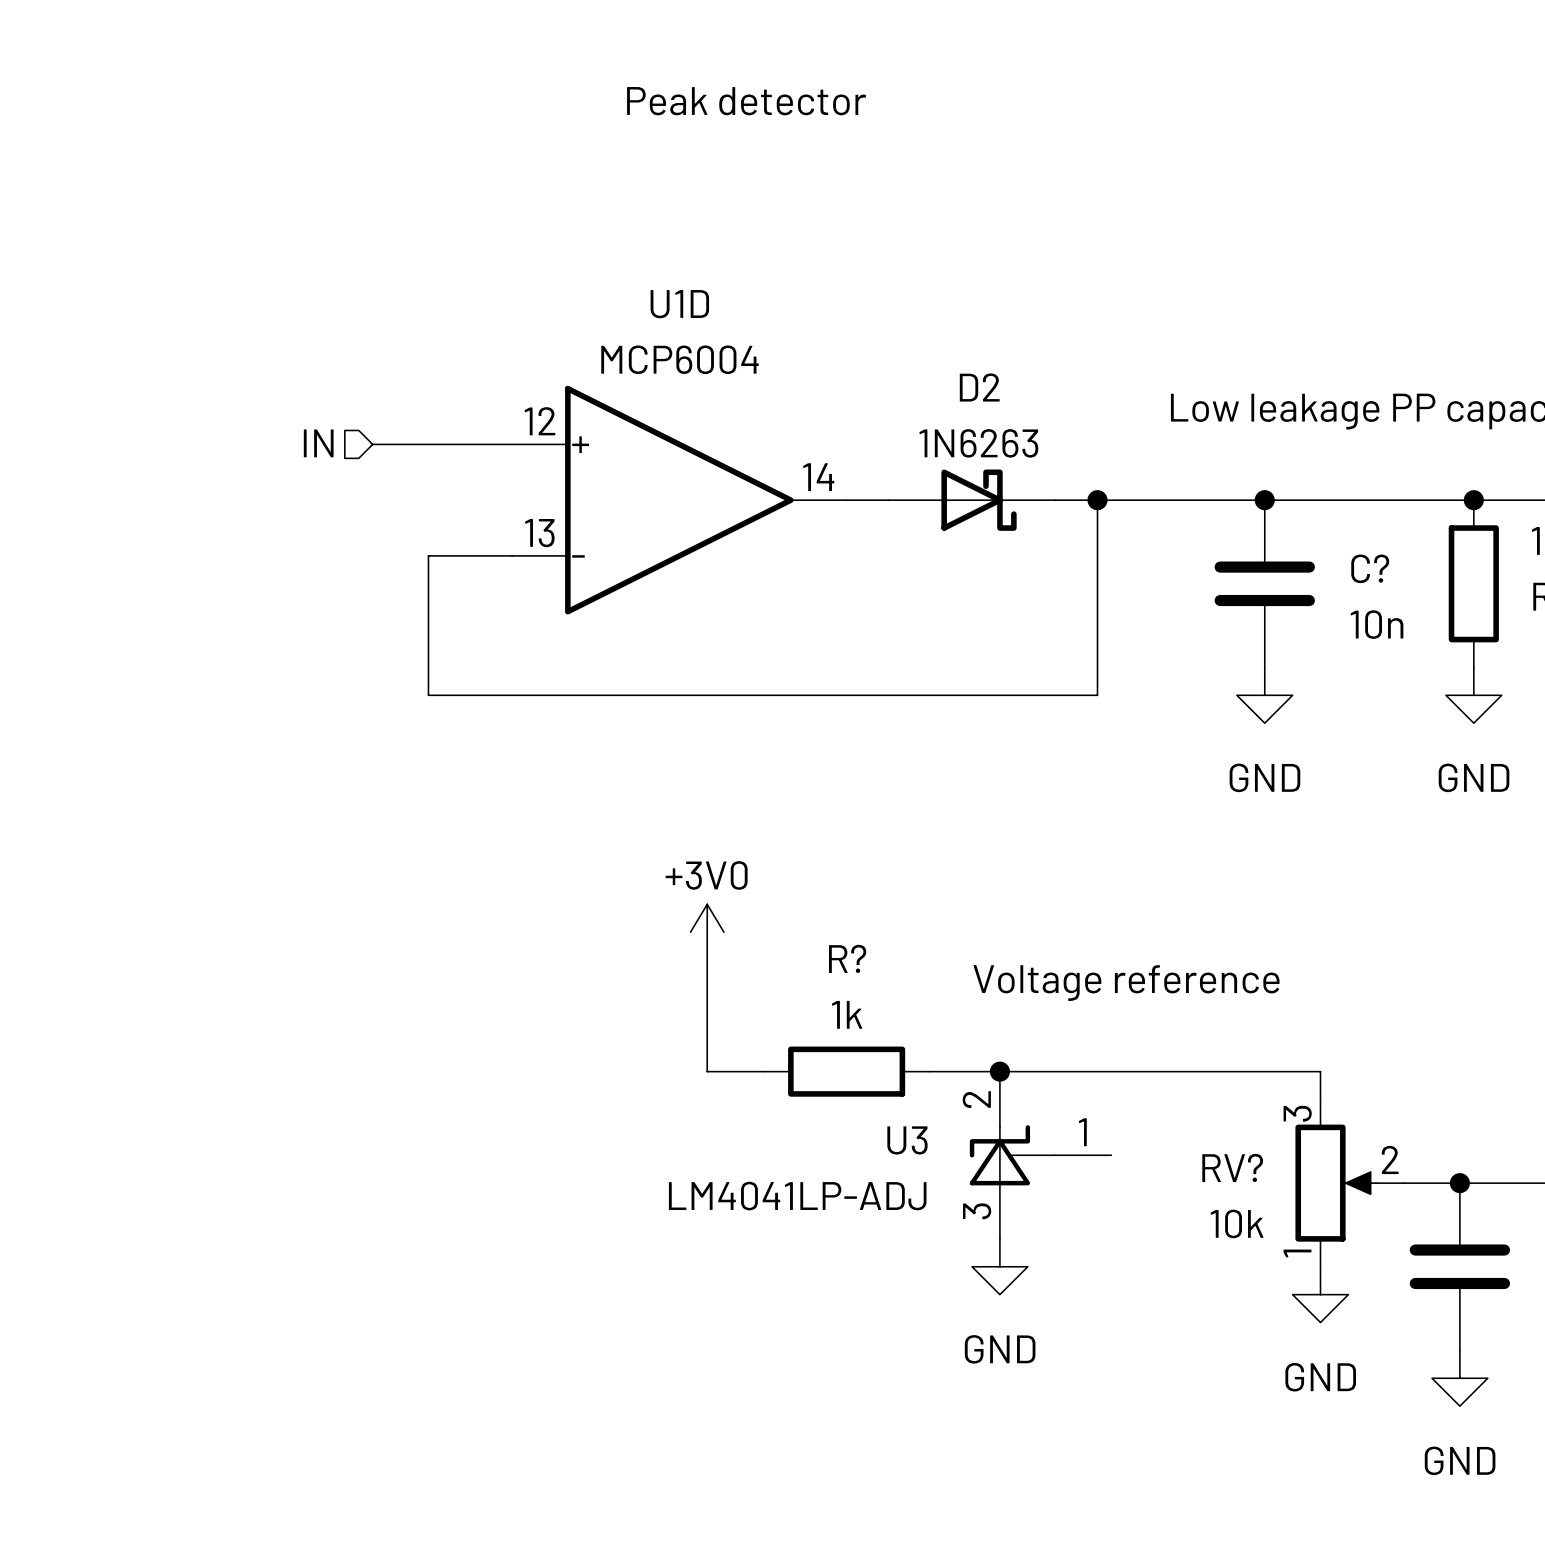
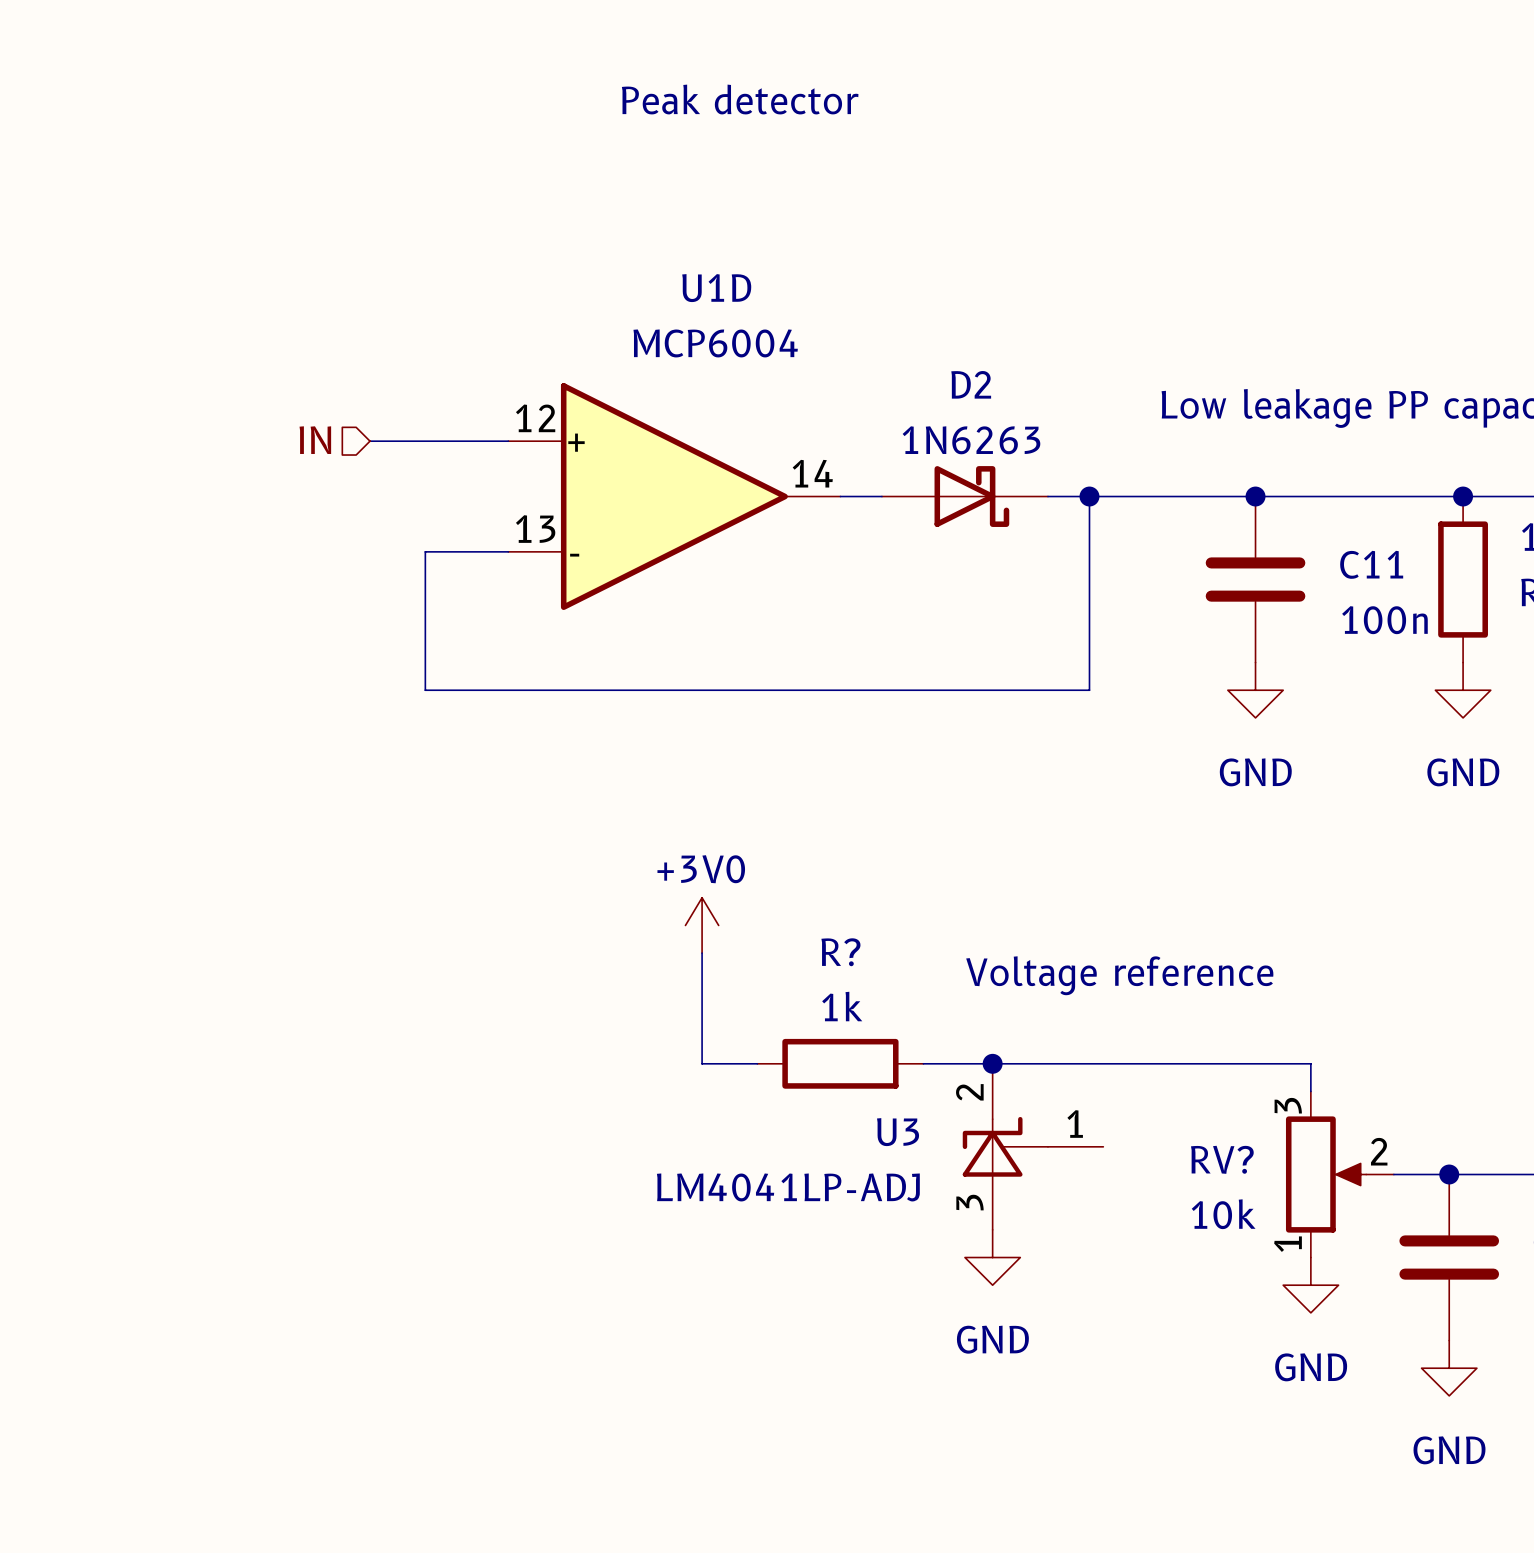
U1D name position: U1D (679, 304) -> U1D (716, 288)
U1D value position: MCP6004 (680, 359) -> MCP6004 (715, 343)
C? name: C? (1370, 568) -> C11 (1371, 564)
C? value: 10n (1377, 624) -> 100n (1384, 620)

